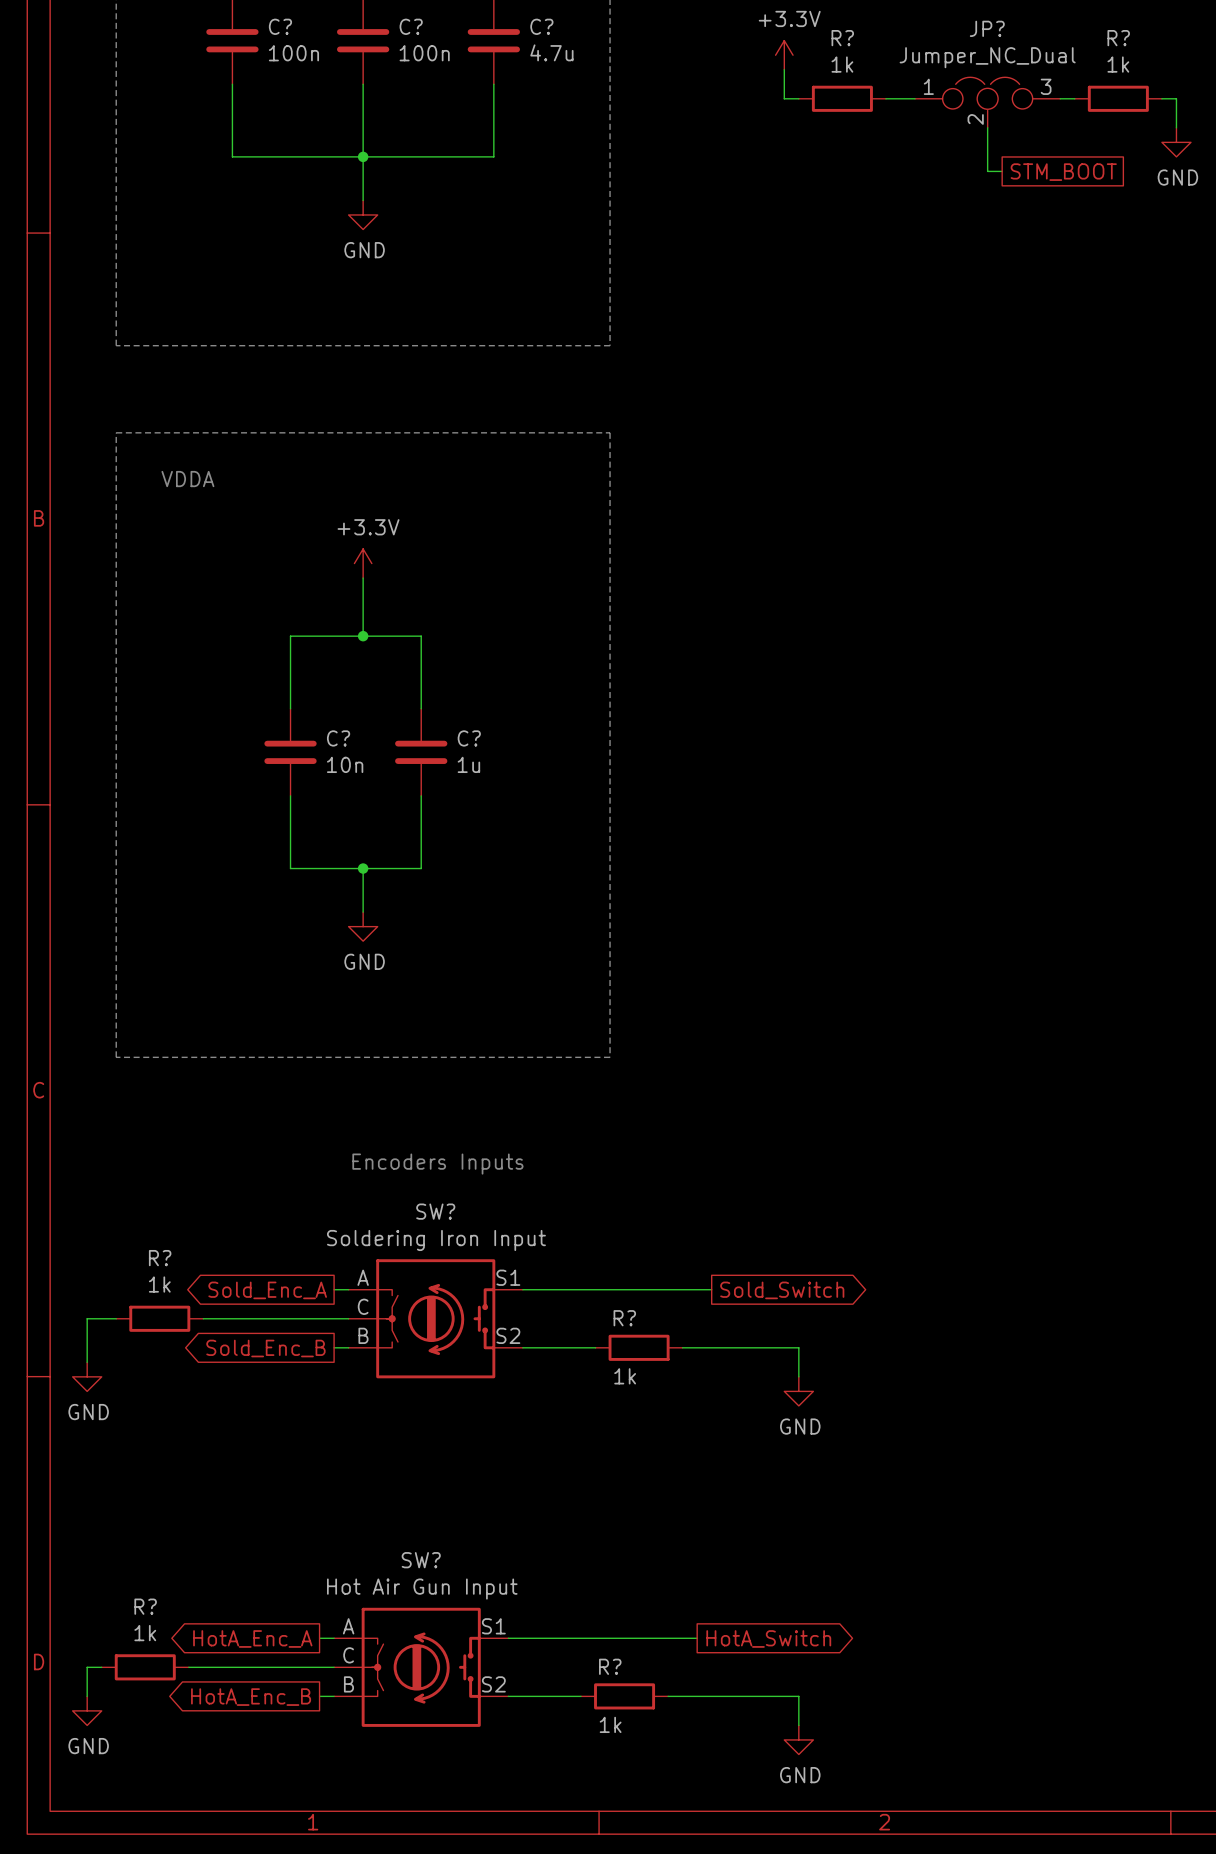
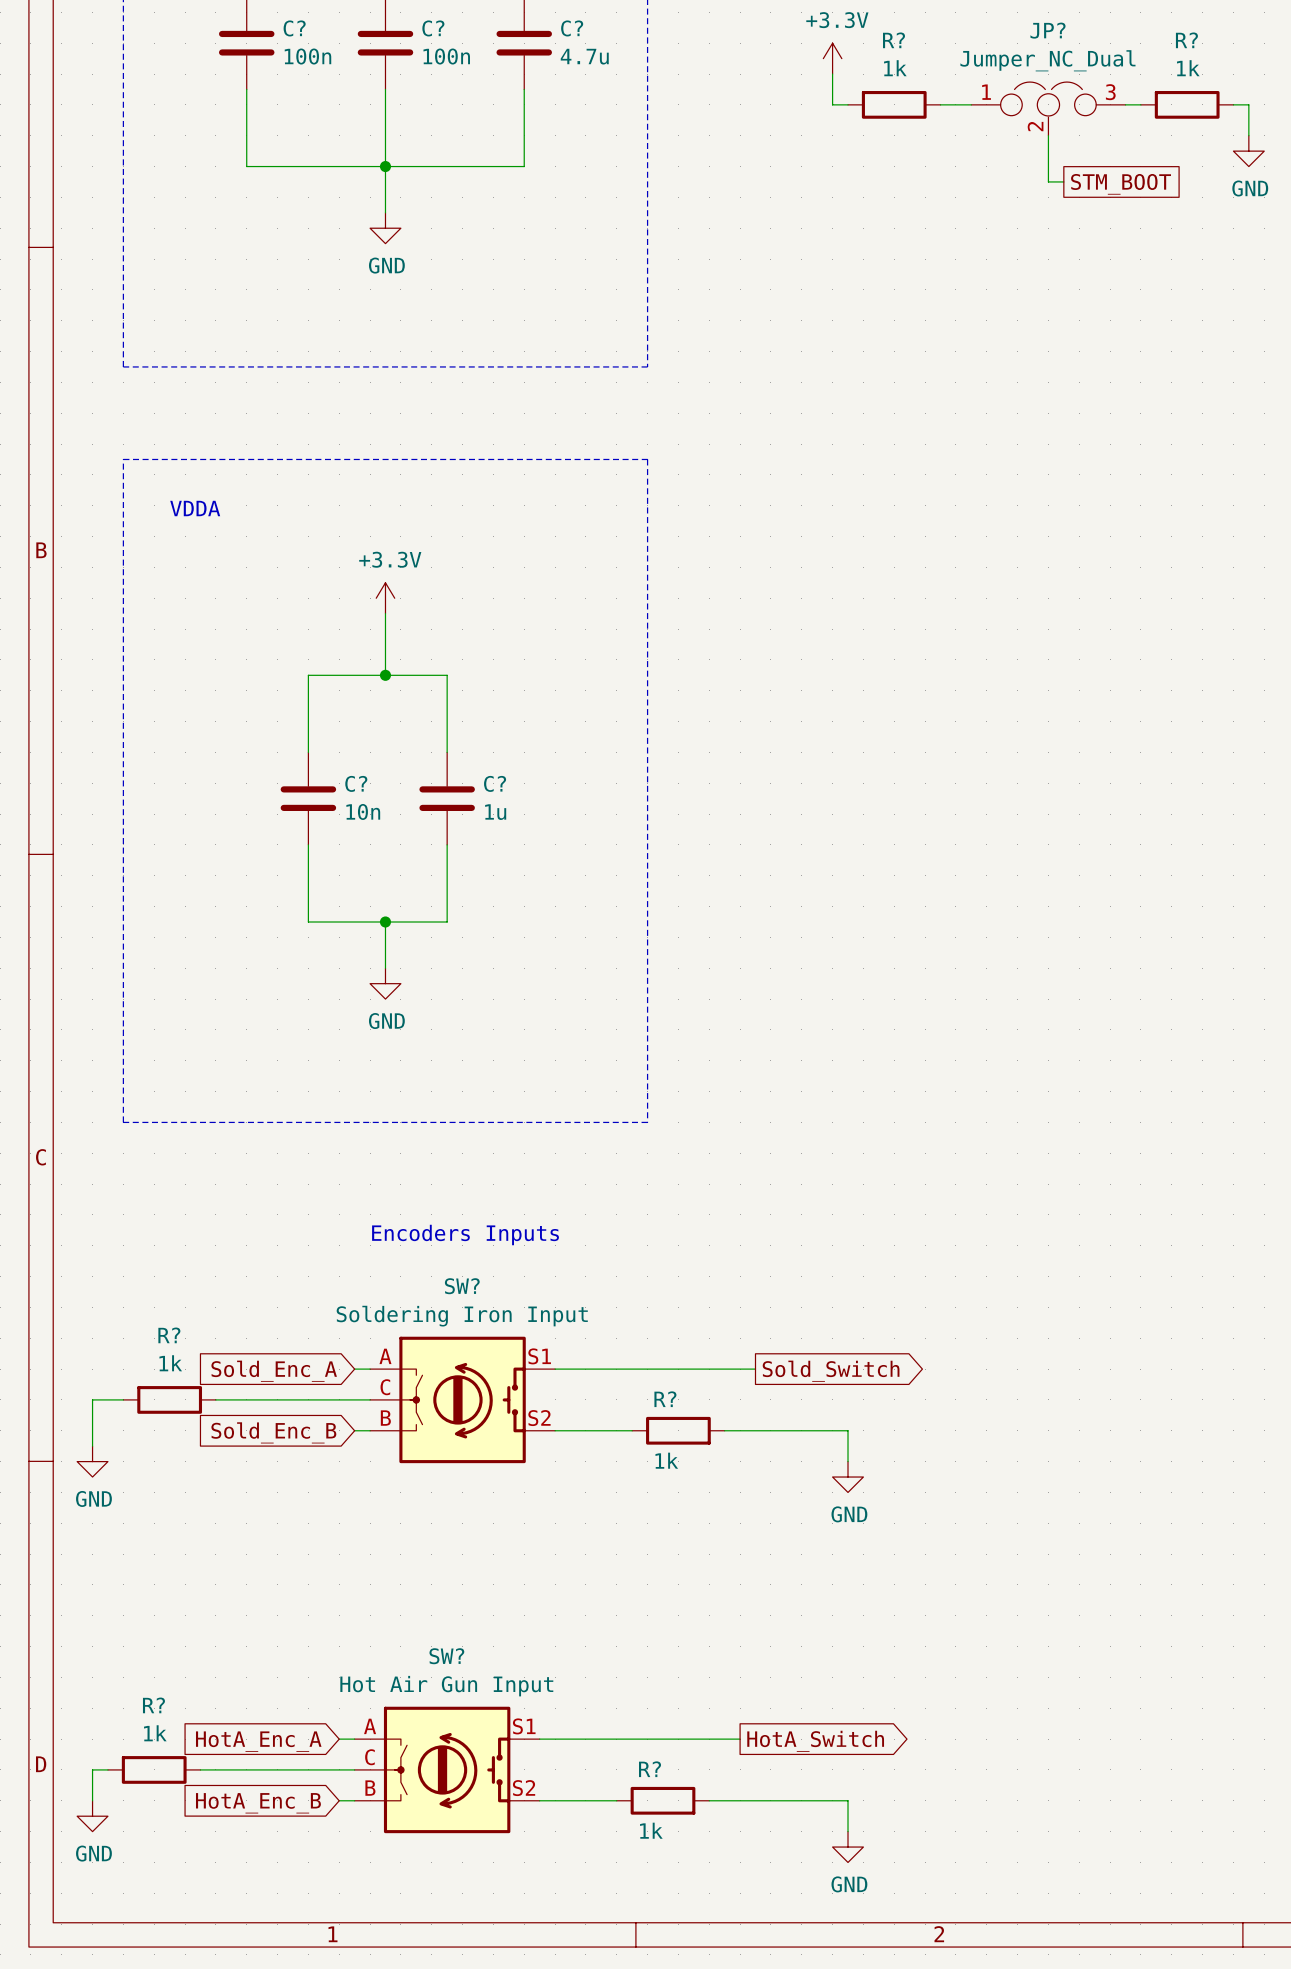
global label shape: output (267, 1290) -> input (274, 1371)
global label shape: output (265, 1348) -> input (273, 1432)
global label shape: output (252, 1638) -> input (258, 1741)
global label shape: output (251, 1697) -> input (258, 1803)

